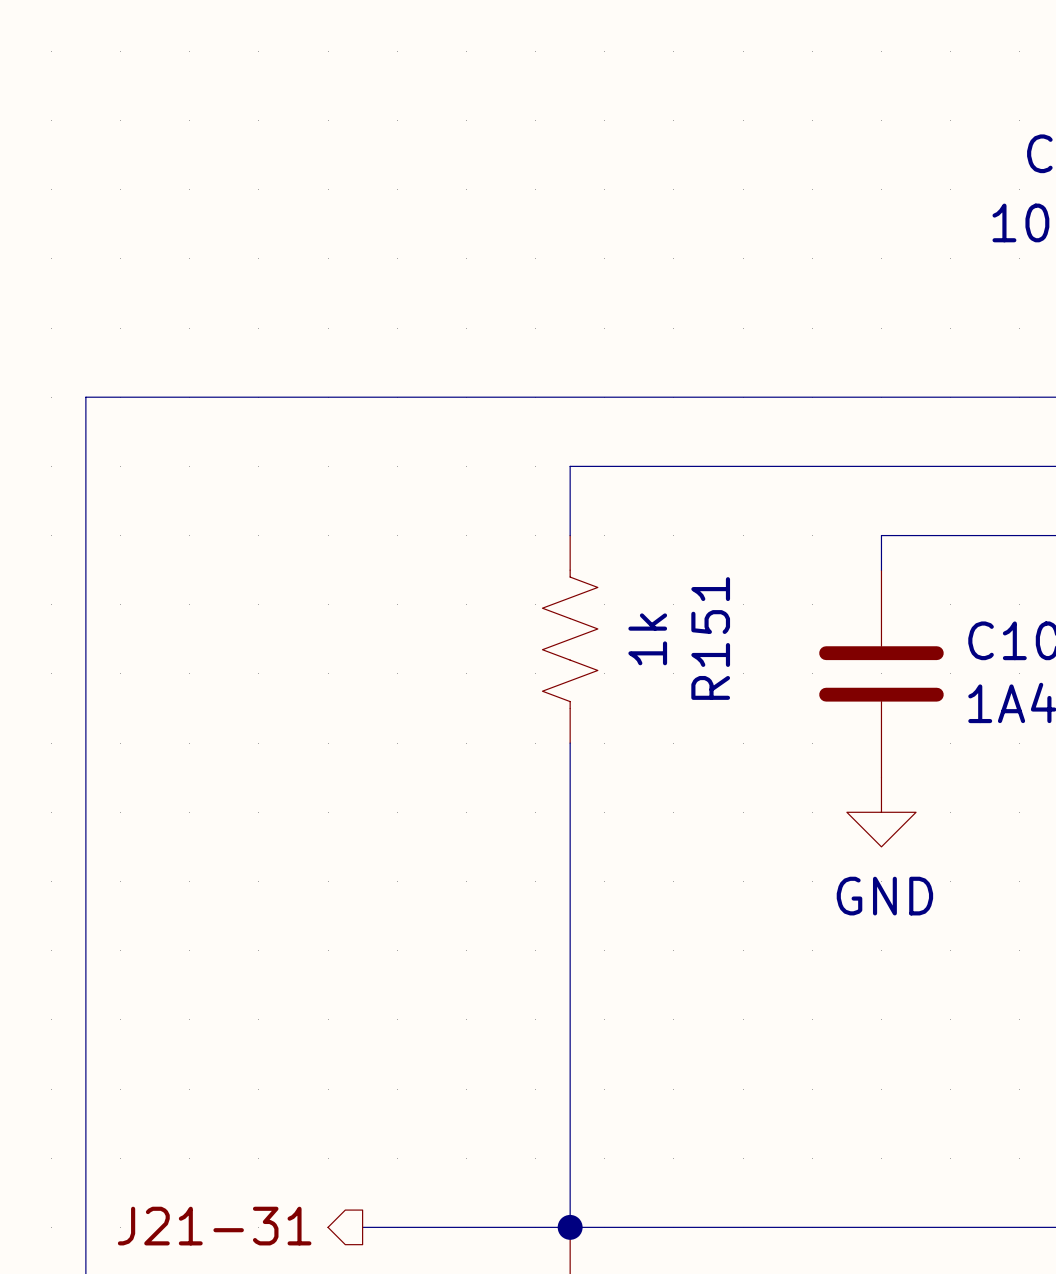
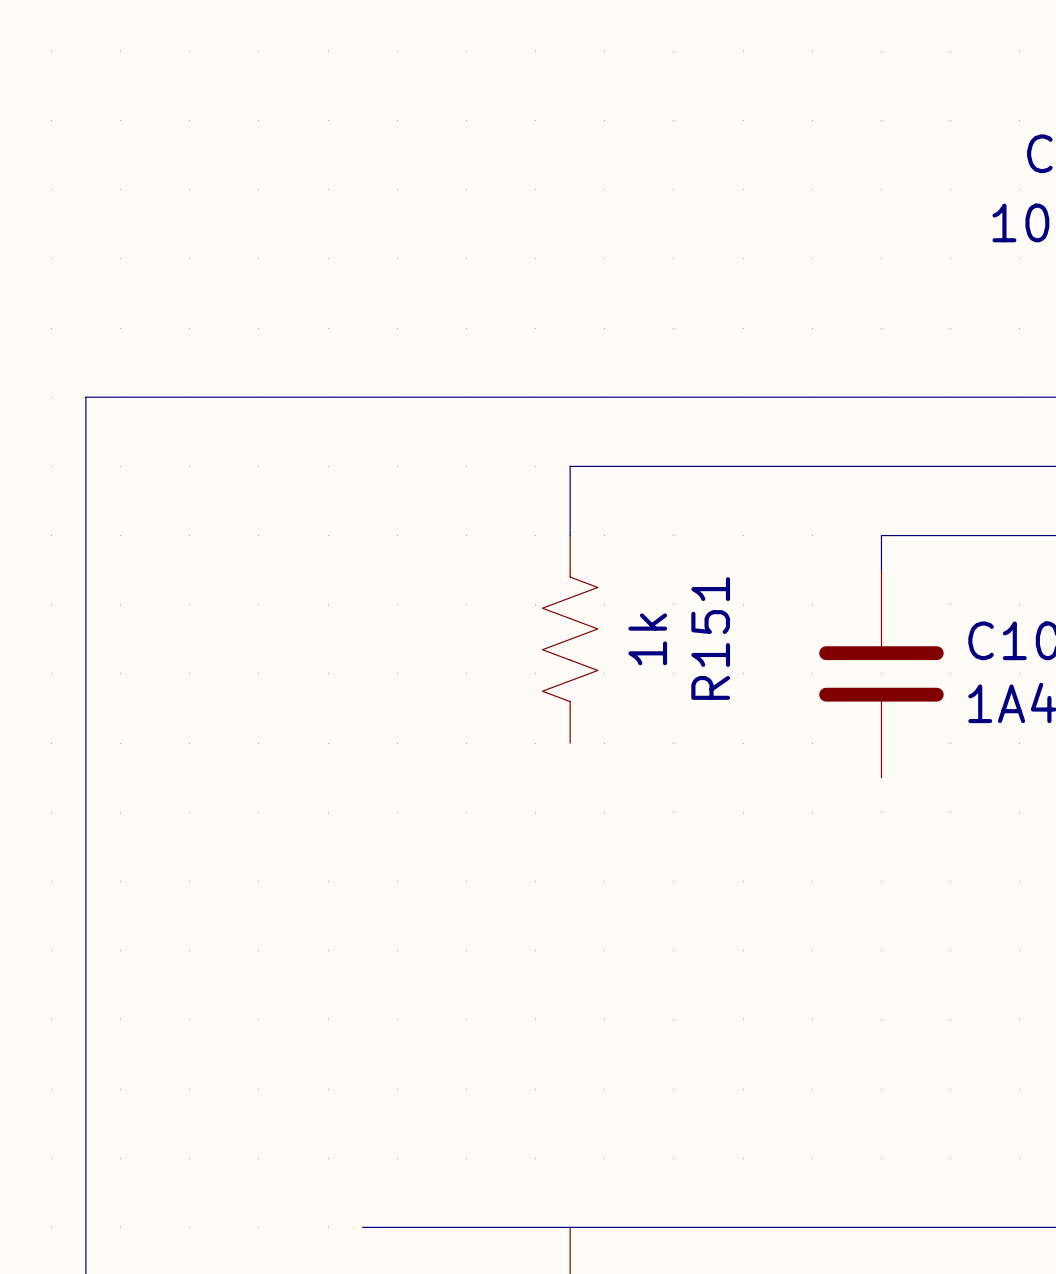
wire: (570, 743) (570, 1227) -> none
power symbol: GND (881, 812) -> none
hierarchical label: J21-31 (214, 1226) -> none
junction: (570, 1227) -> none

